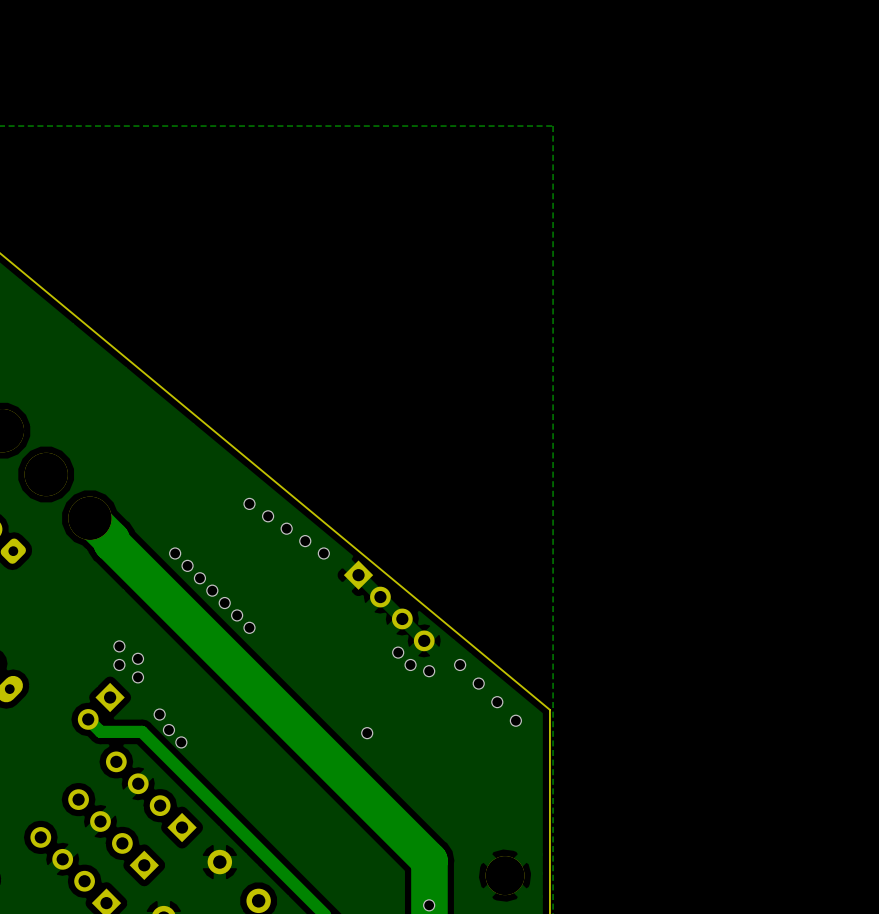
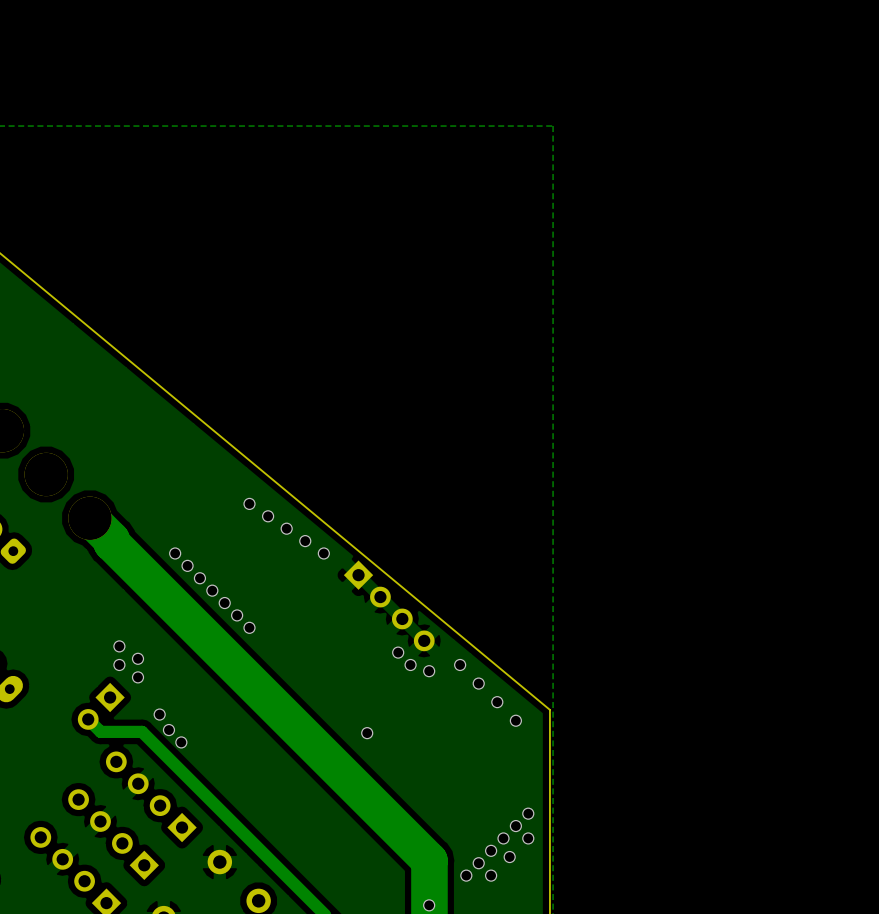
via: none -> (528, 813)
via: none -> (515, 826)
via: none -> (503, 838)
via: none -> (528, 838)
via: none -> (491, 850)
via: none -> (509, 857)
via: none -> (478, 863)
via: none -> (466, 875)
via: none -> (491, 875)
part: (505, 875) -> none

